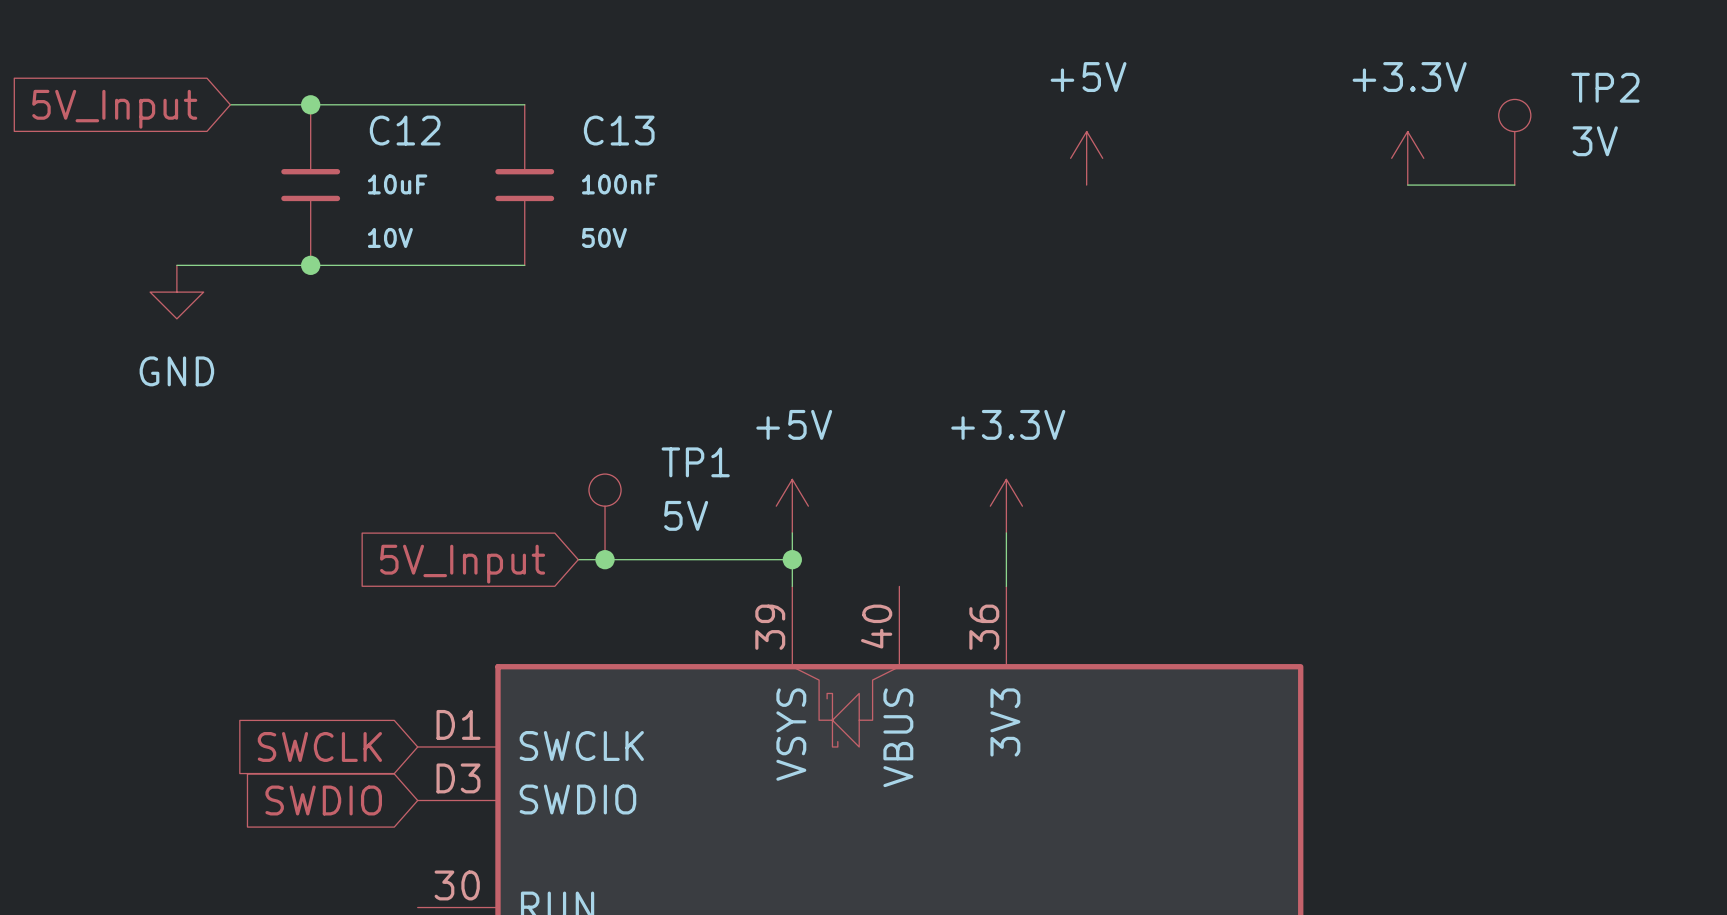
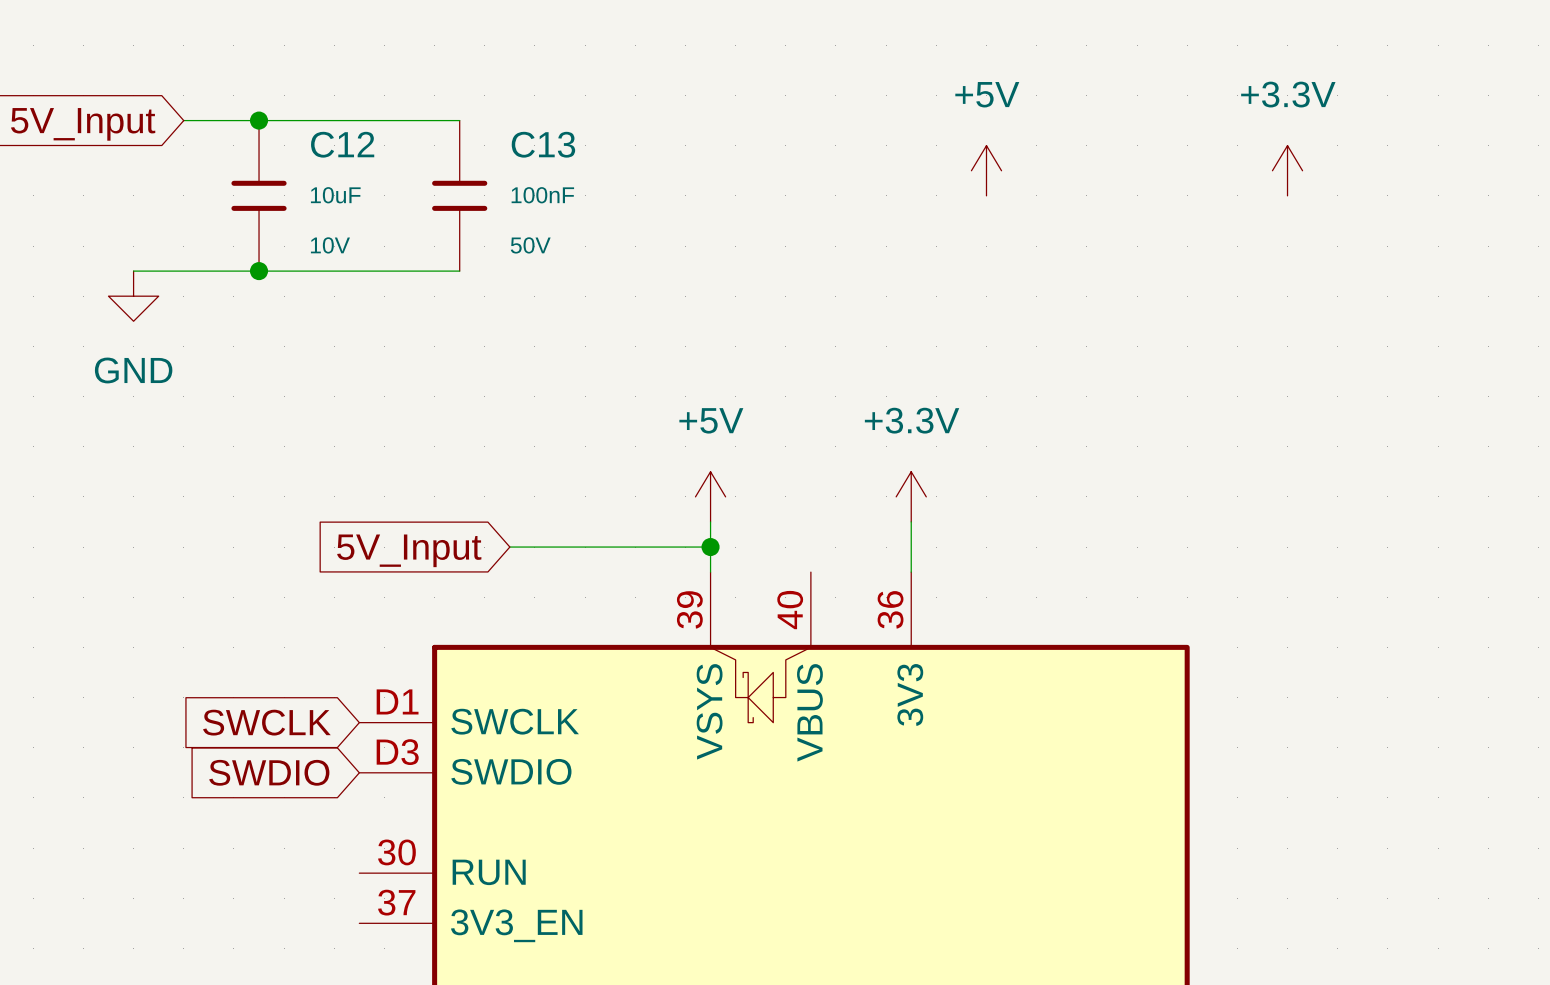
TP2: 3V (1514, 142) -> none
wire: (1407, 185) (1514, 185) -> none
TP1: 5V (605, 516) -> none
junction: (605, 559) -> none

